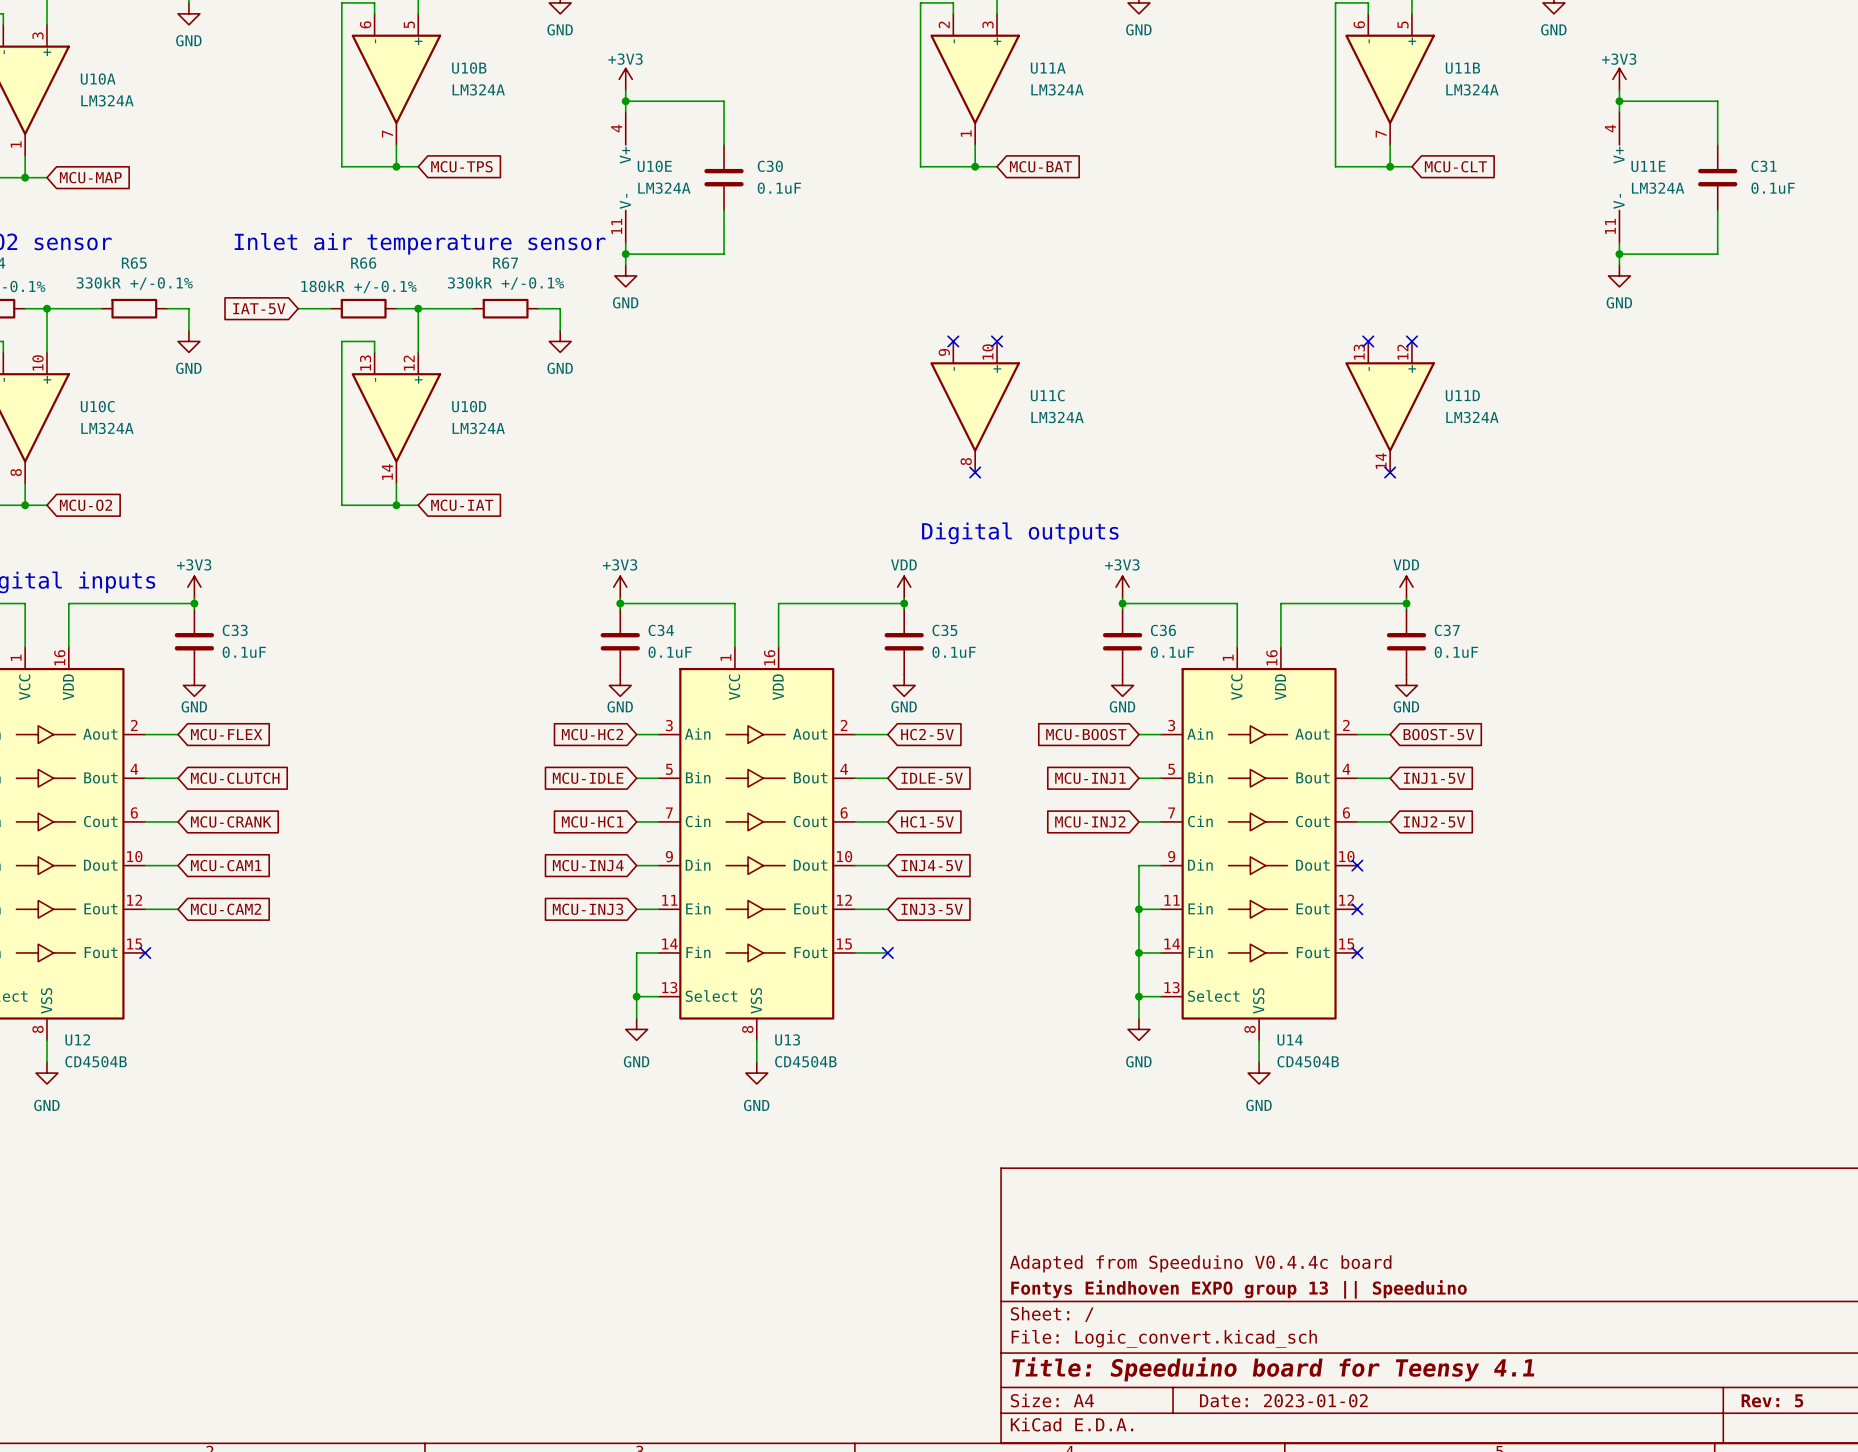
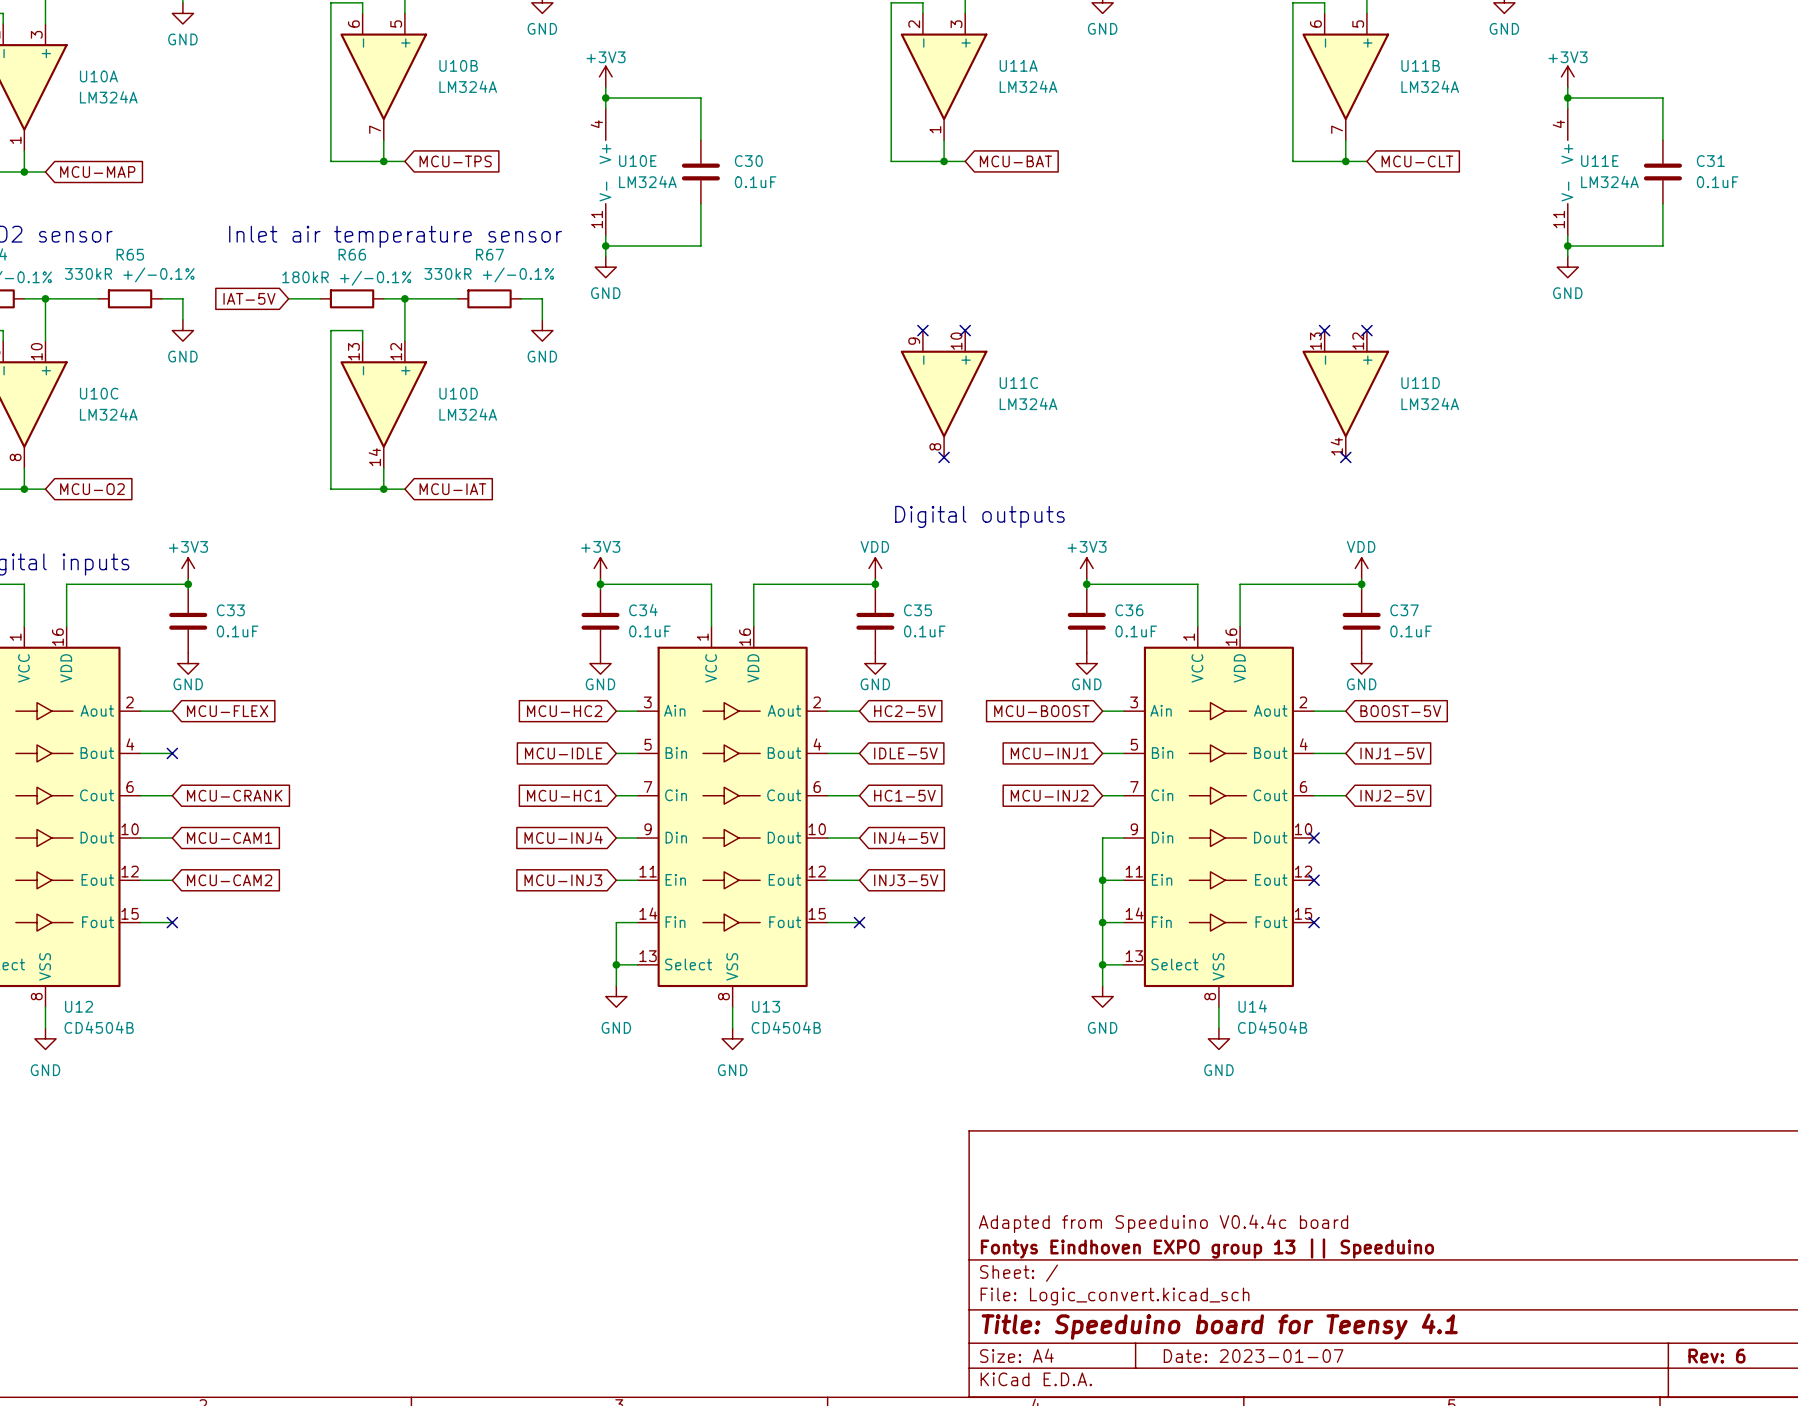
no-connect mark: none -> (172, 753)
global label: MCU-CLUTCH (235, 778) -> none
wire: none -> (140, 922) (172, 922)
no-connect mark position: (145, 952) -> (172, 922)
title block: Date: 2023-01-02 (1283, 1400) -> Date: 2023-01-07 (1253, 1356)
title block: Rev: 5 (1772, 1400) -> Rev: 6 (1716, 1356)

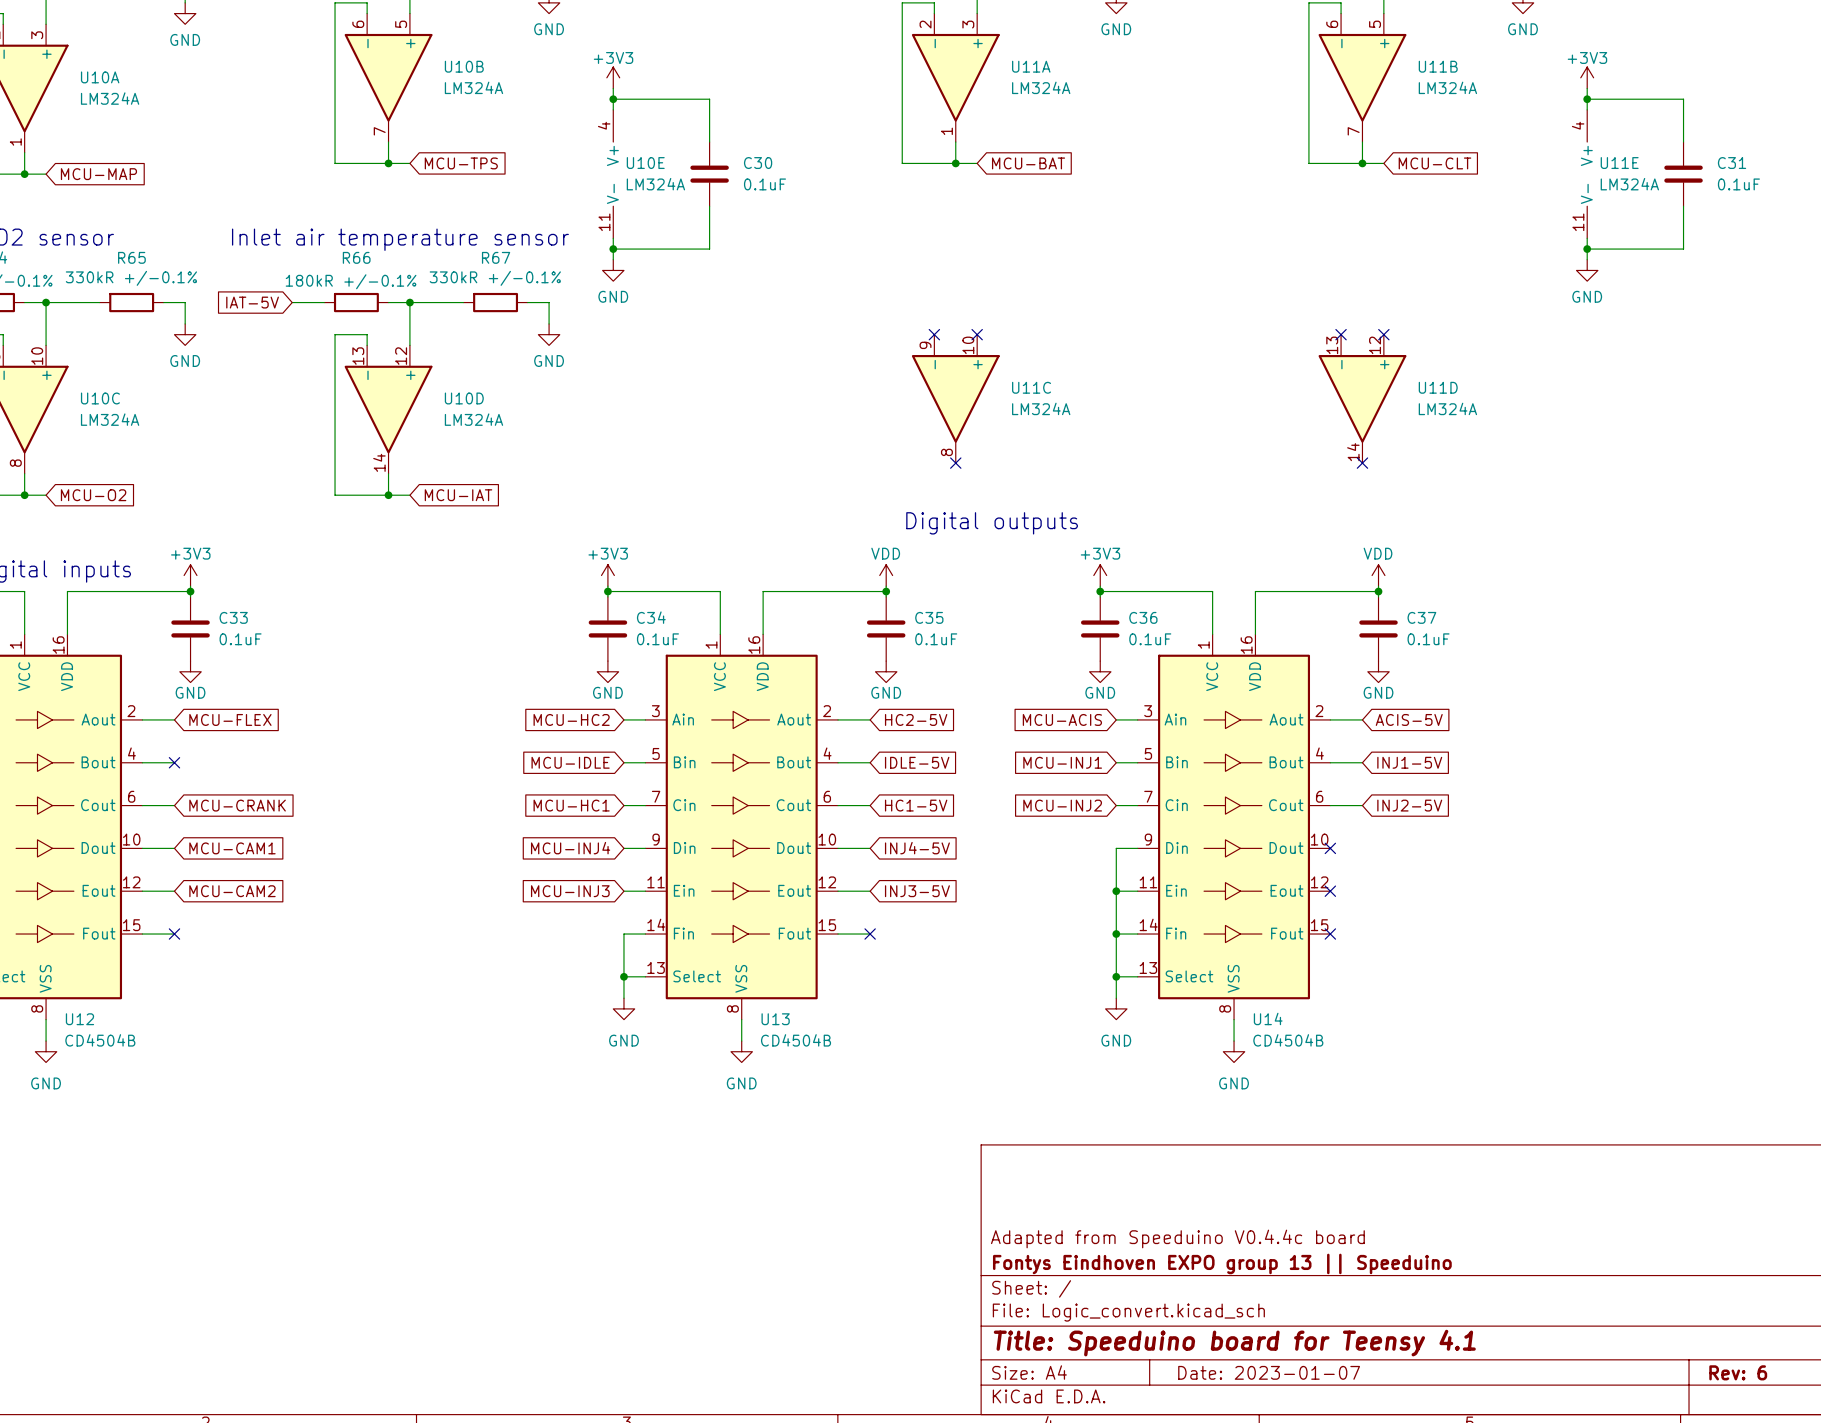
global label: MCU-BOOST (1041, 711) -> MCU-ACIS (1062, 719)
global label: BOOST-5V (1400, 711) -> ACIS-5V (1409, 719)

